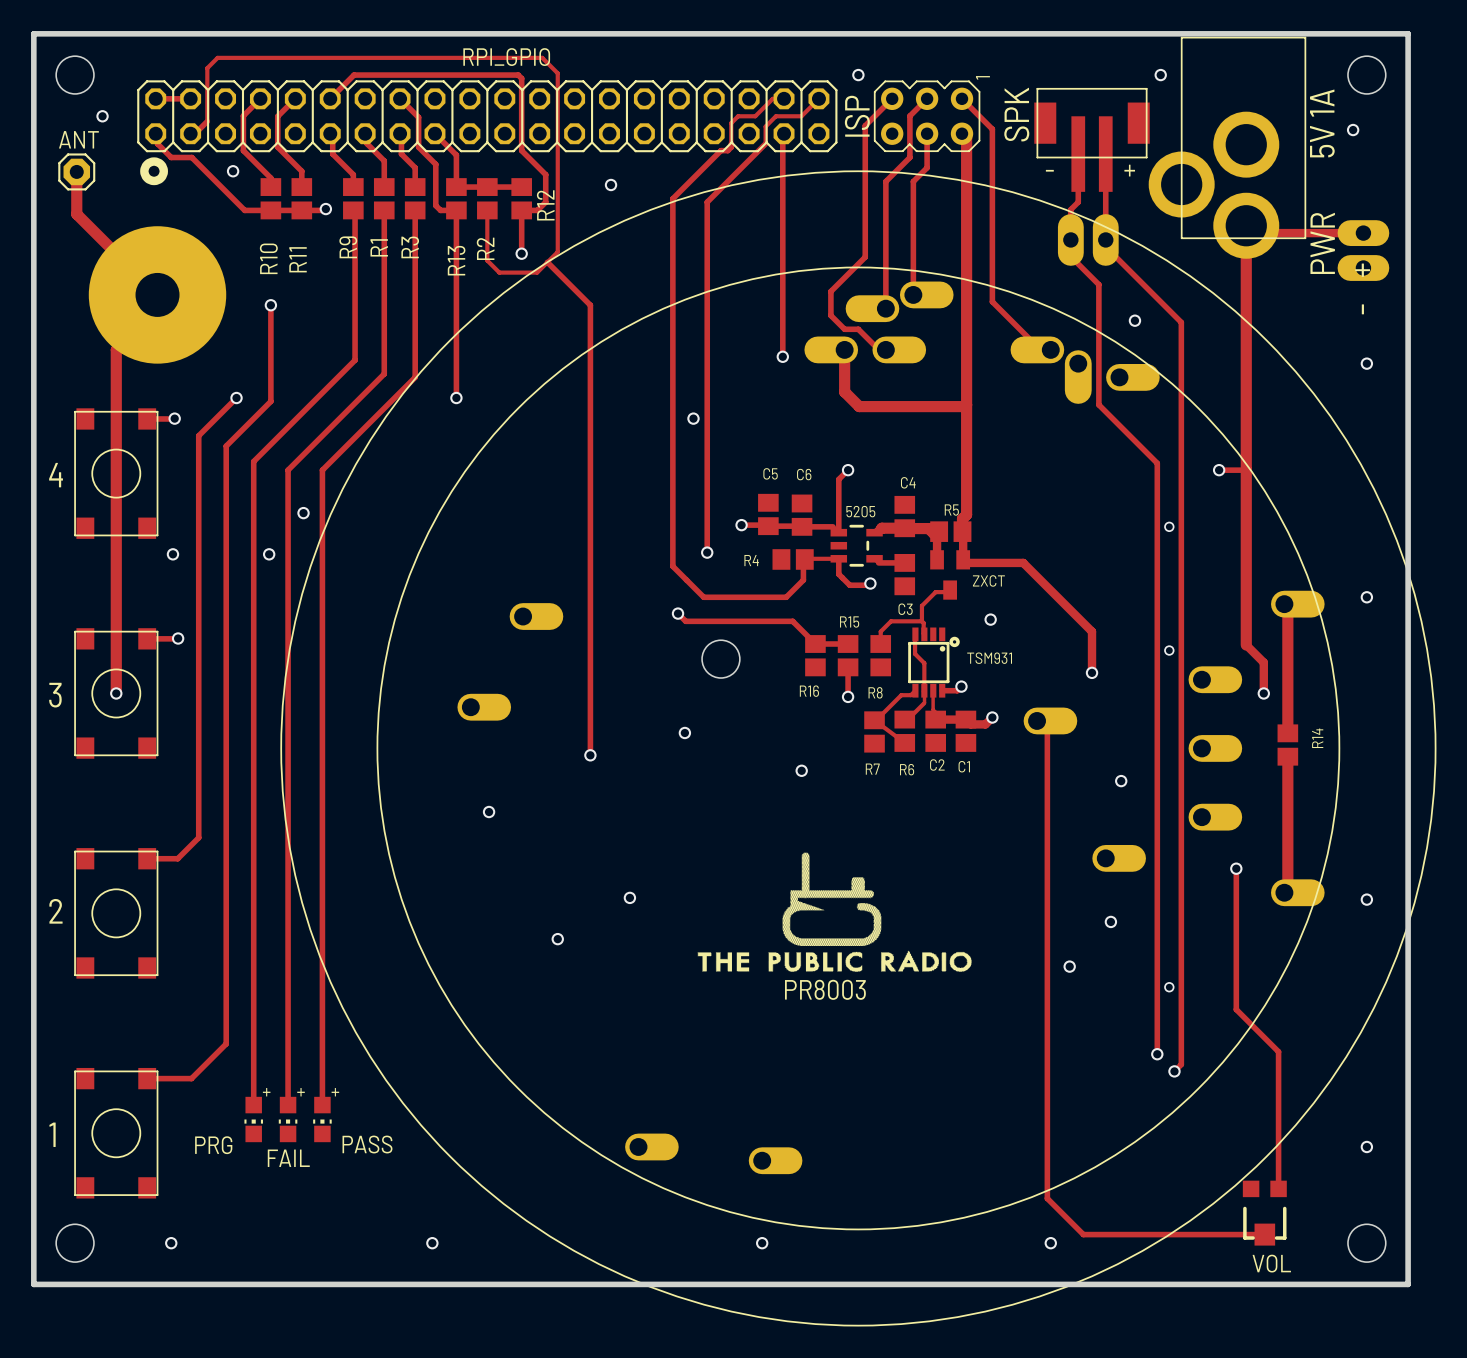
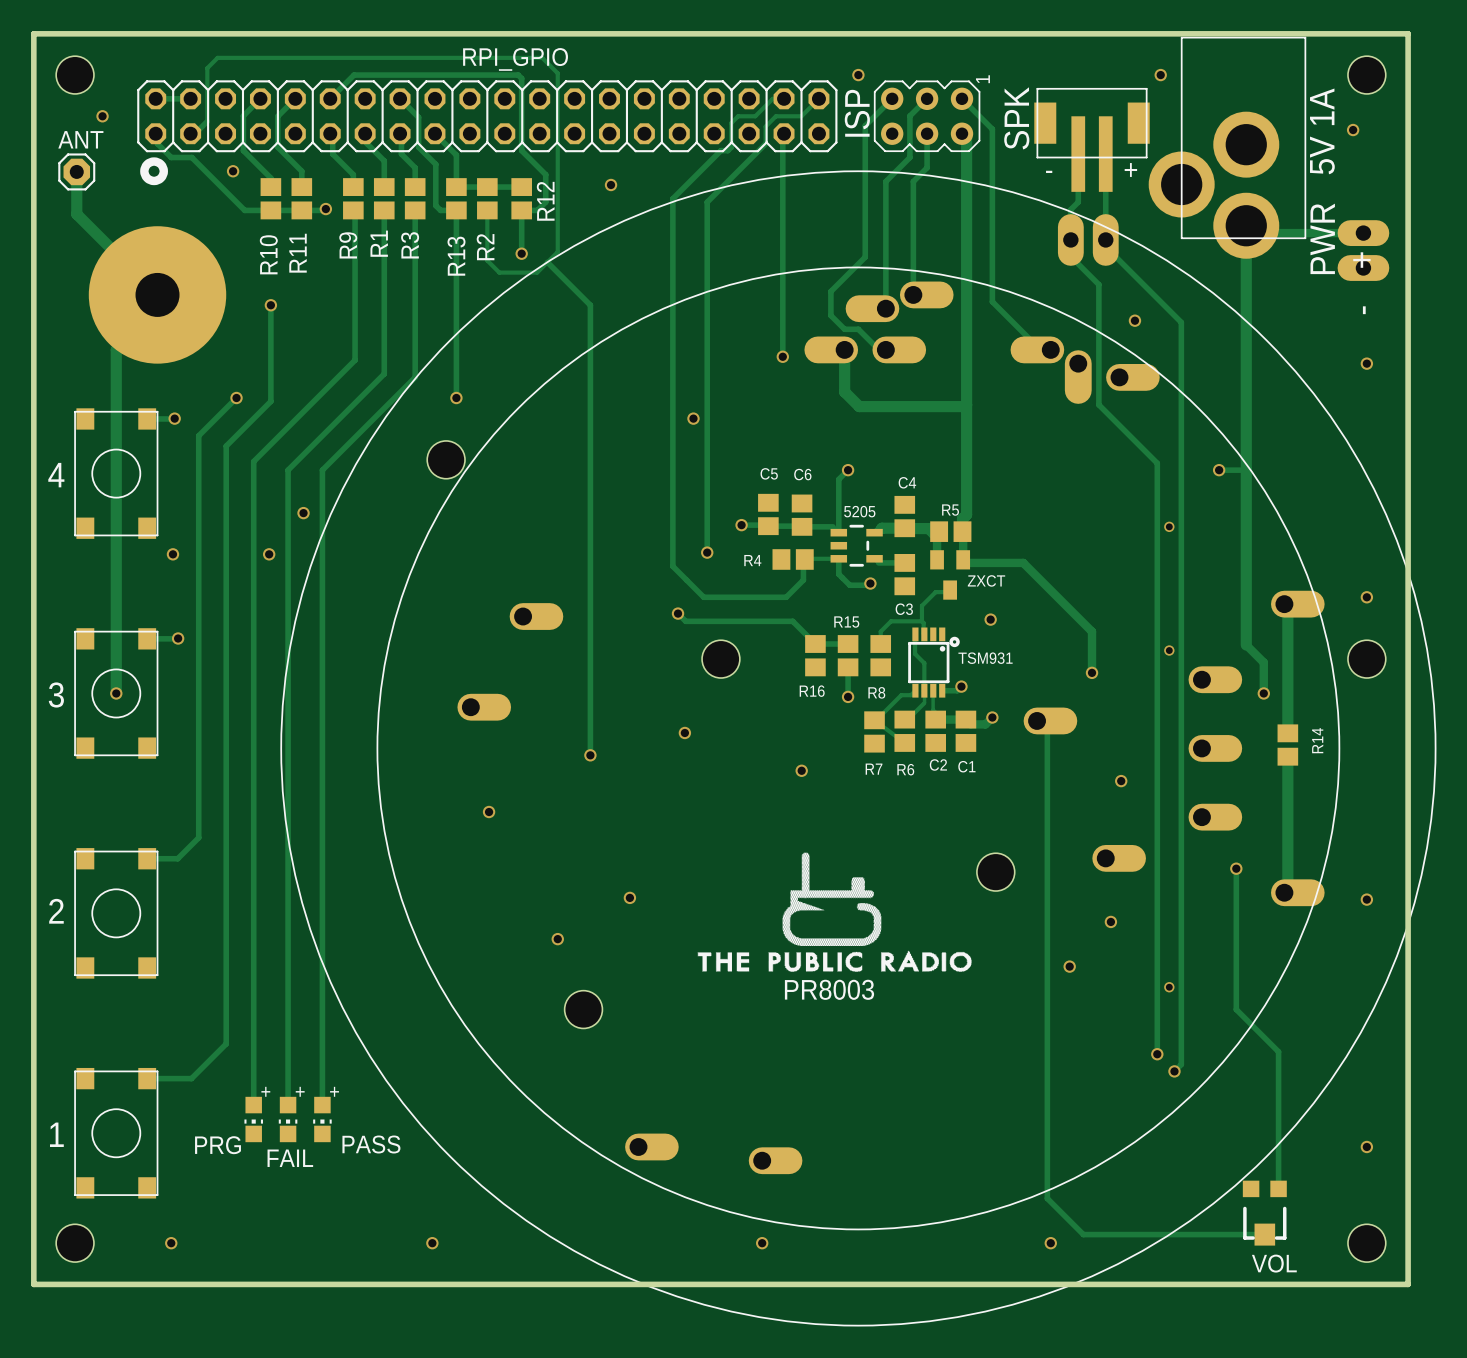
hole: none -> (446, 459)
hole: none -> (1366, 659)
hole: none -> (995, 872)
hole: none -> (583, 1009)

